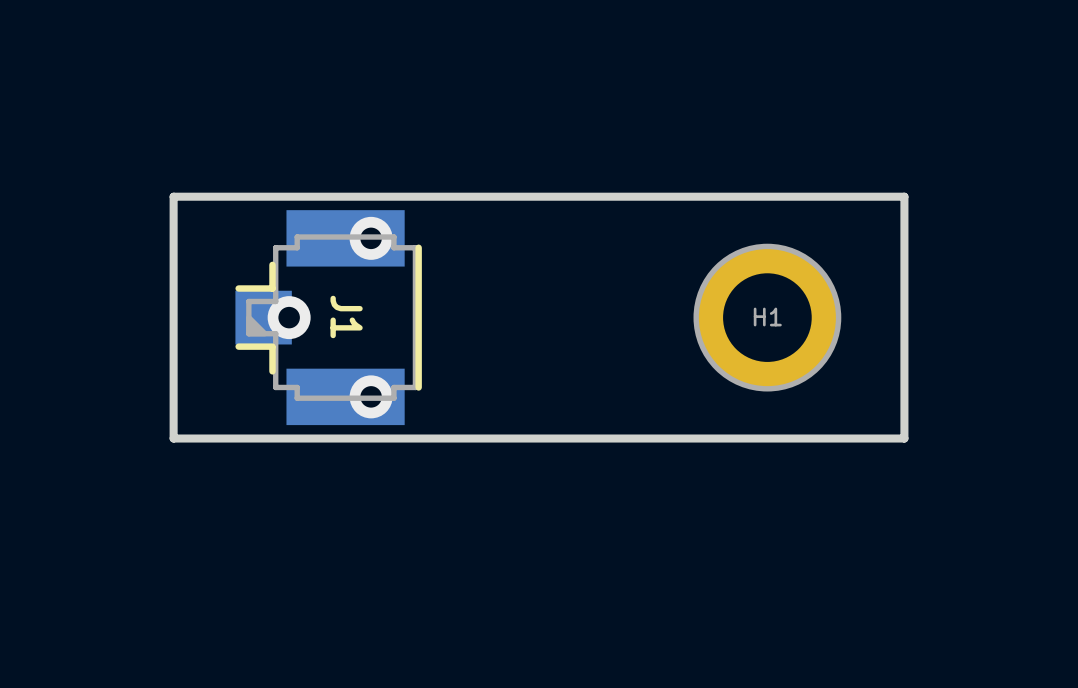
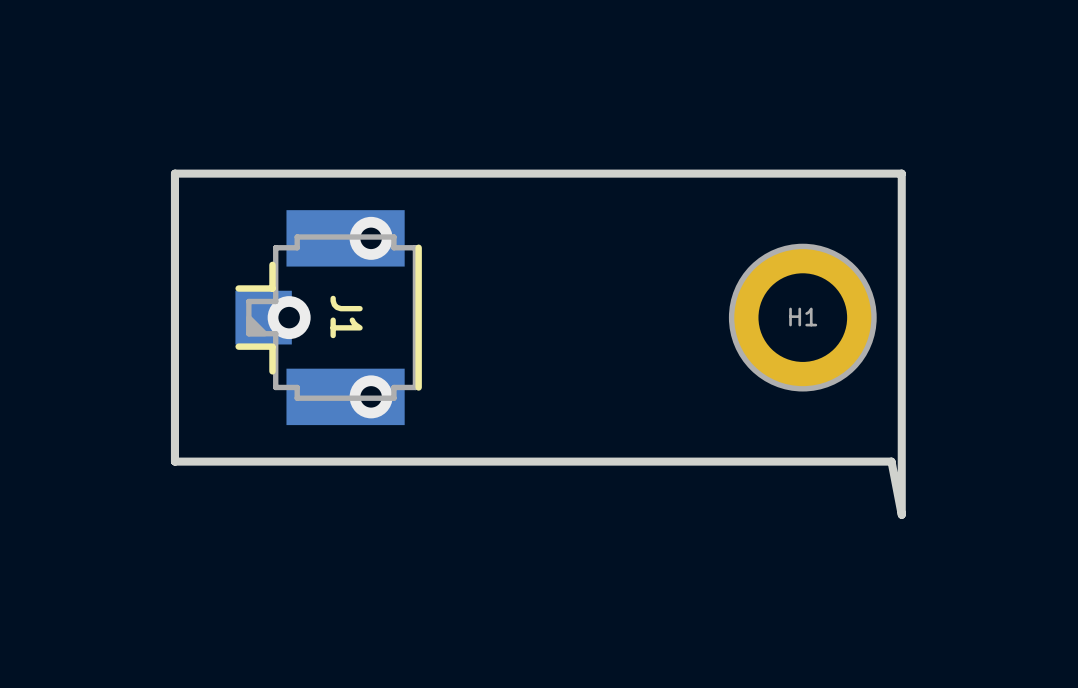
board edge: (904, 196) (904, 438) (173, 438) (173, 196) (904, 196) -> (901, 173) (901, 514) (891, 461) (174, 461) (174, 173) (901, 173)
H1 position: (767, 317) -> (802, 317)

